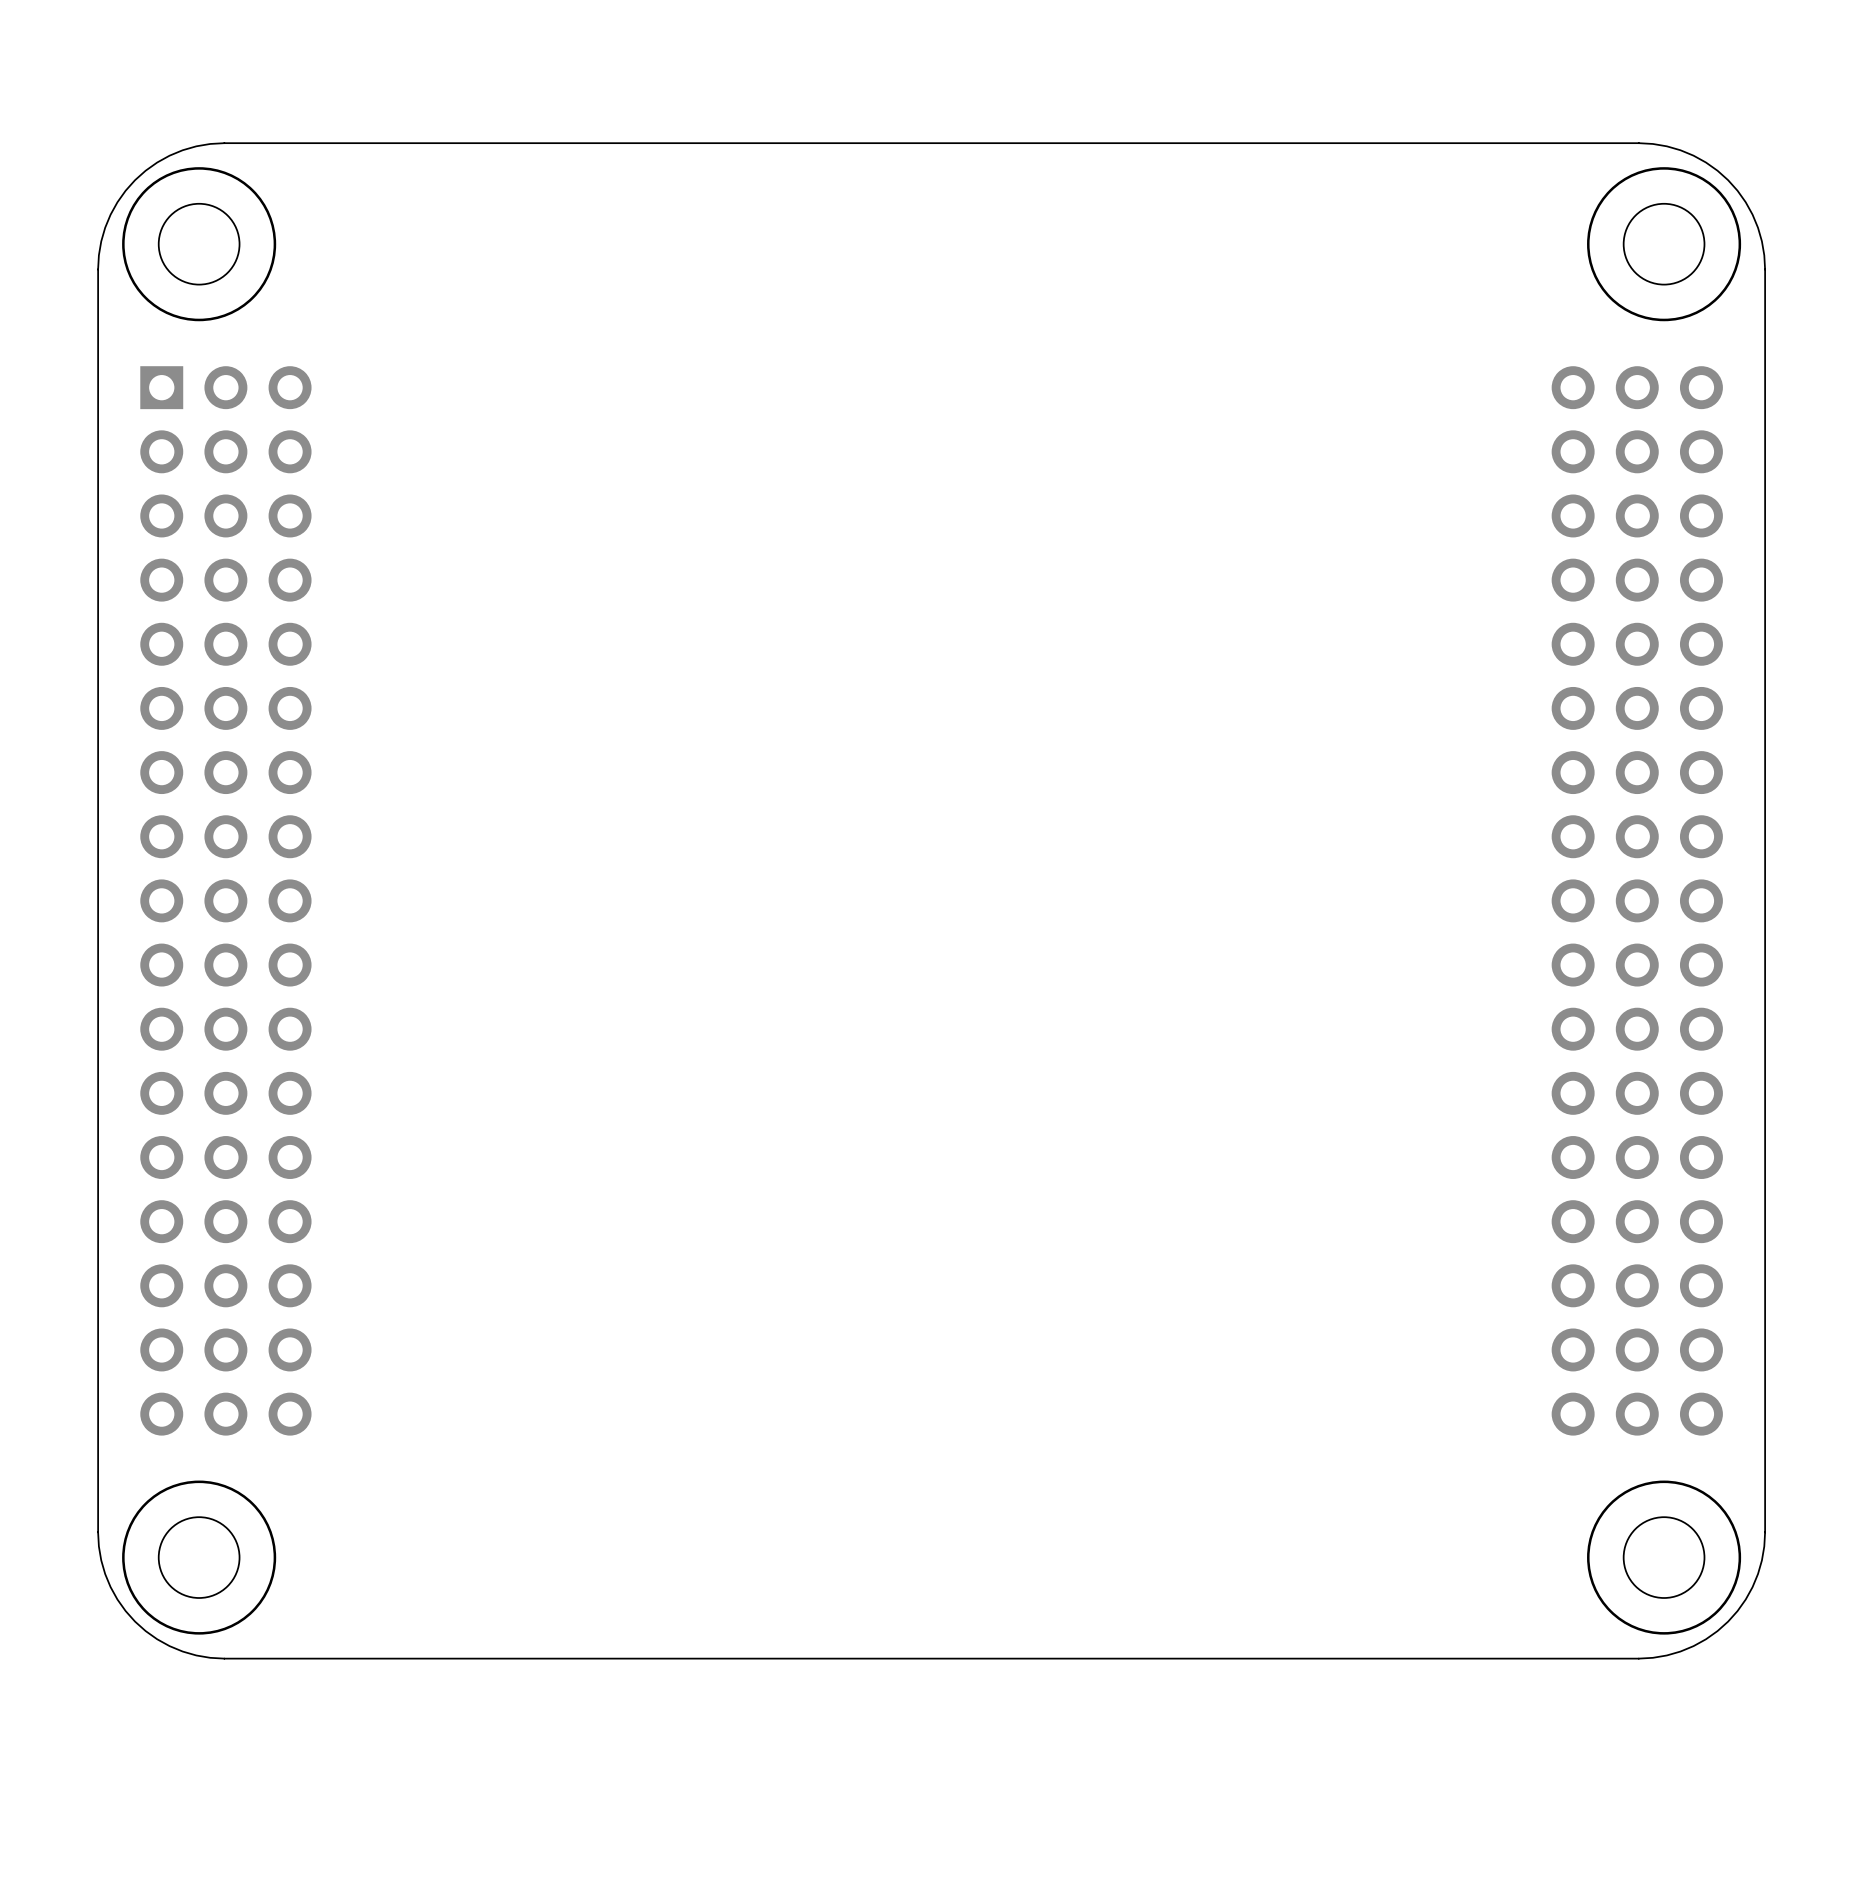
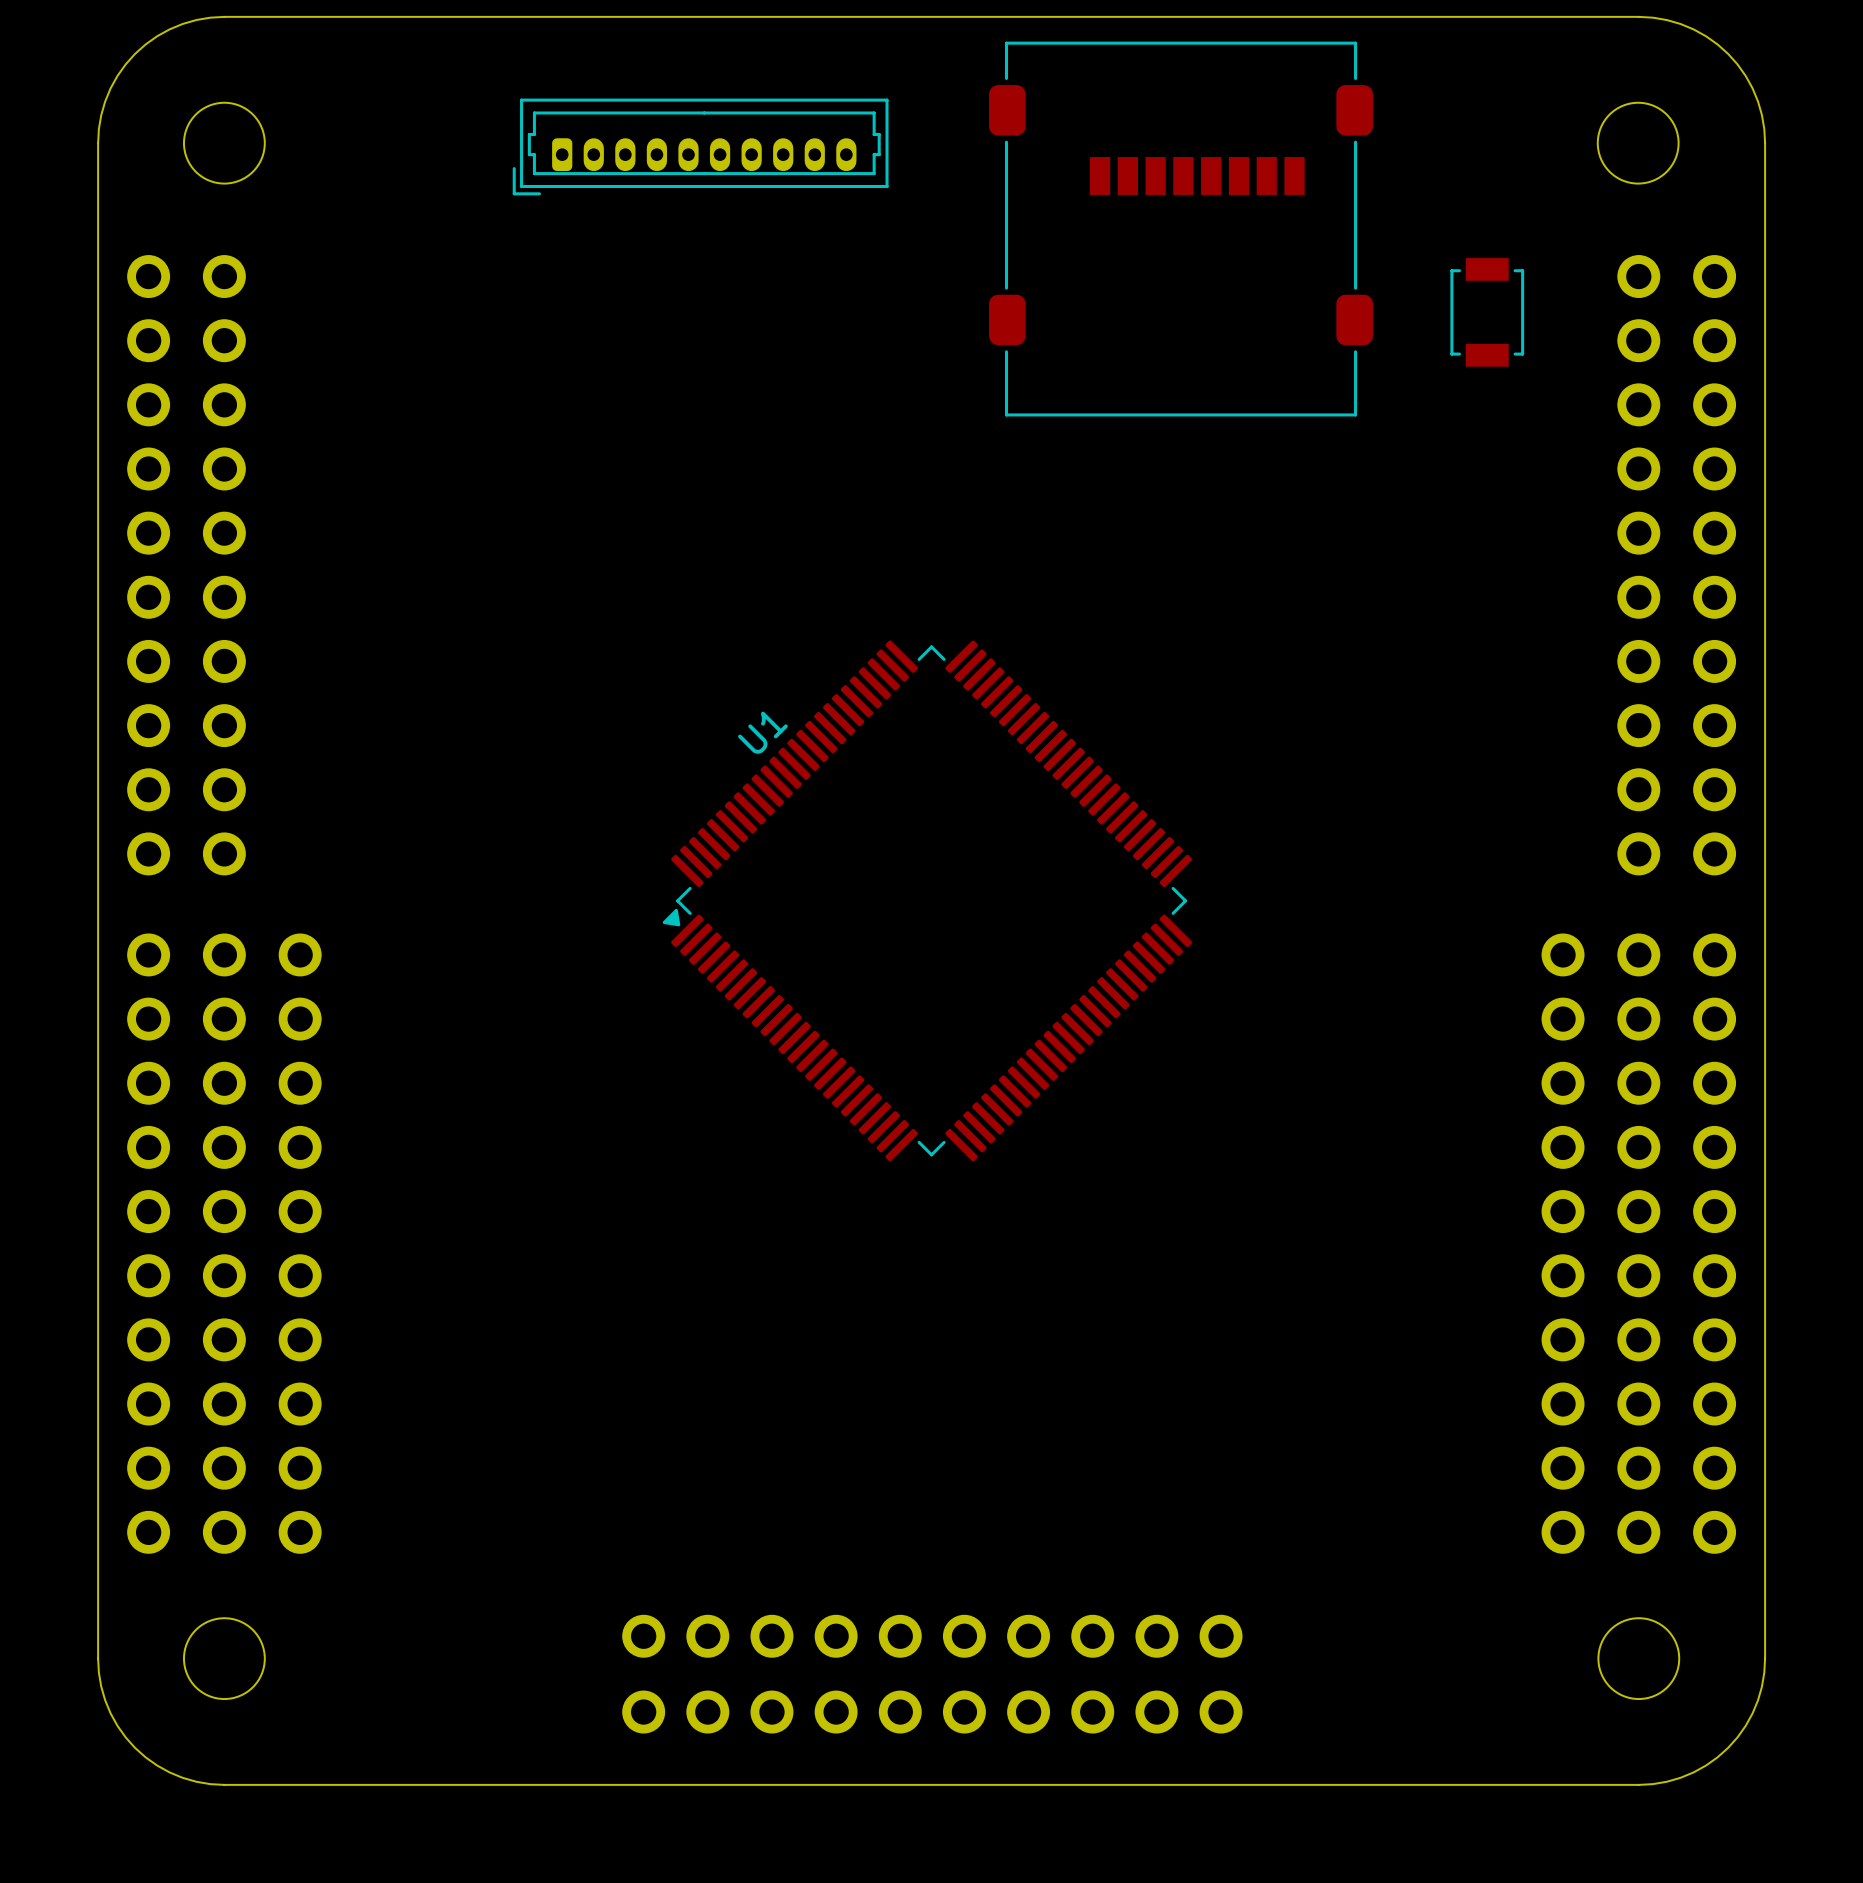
part footprint: [97, 142, 1766, 1660] -> [97, 16, 1766, 1786]
part: none -> (700, 146)
part: none -> (1181, 229)
part: none -> (1487, 312)
U1: none -> (927, 900)

